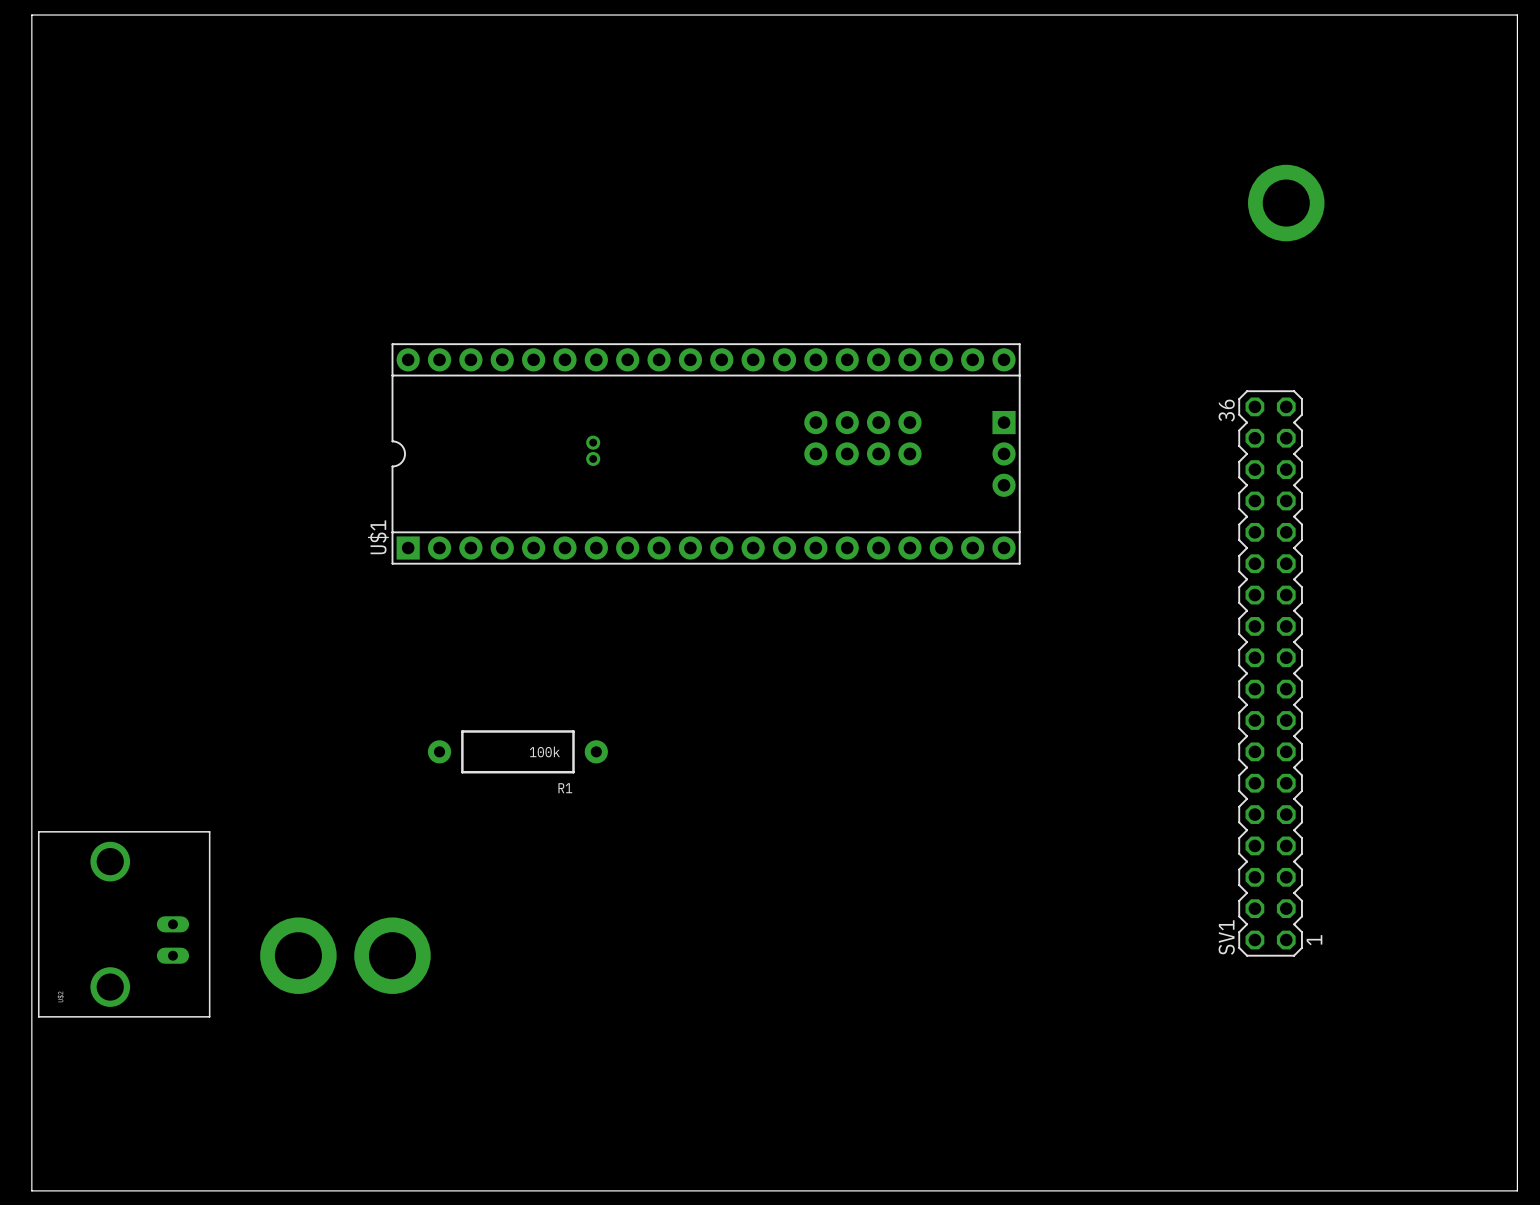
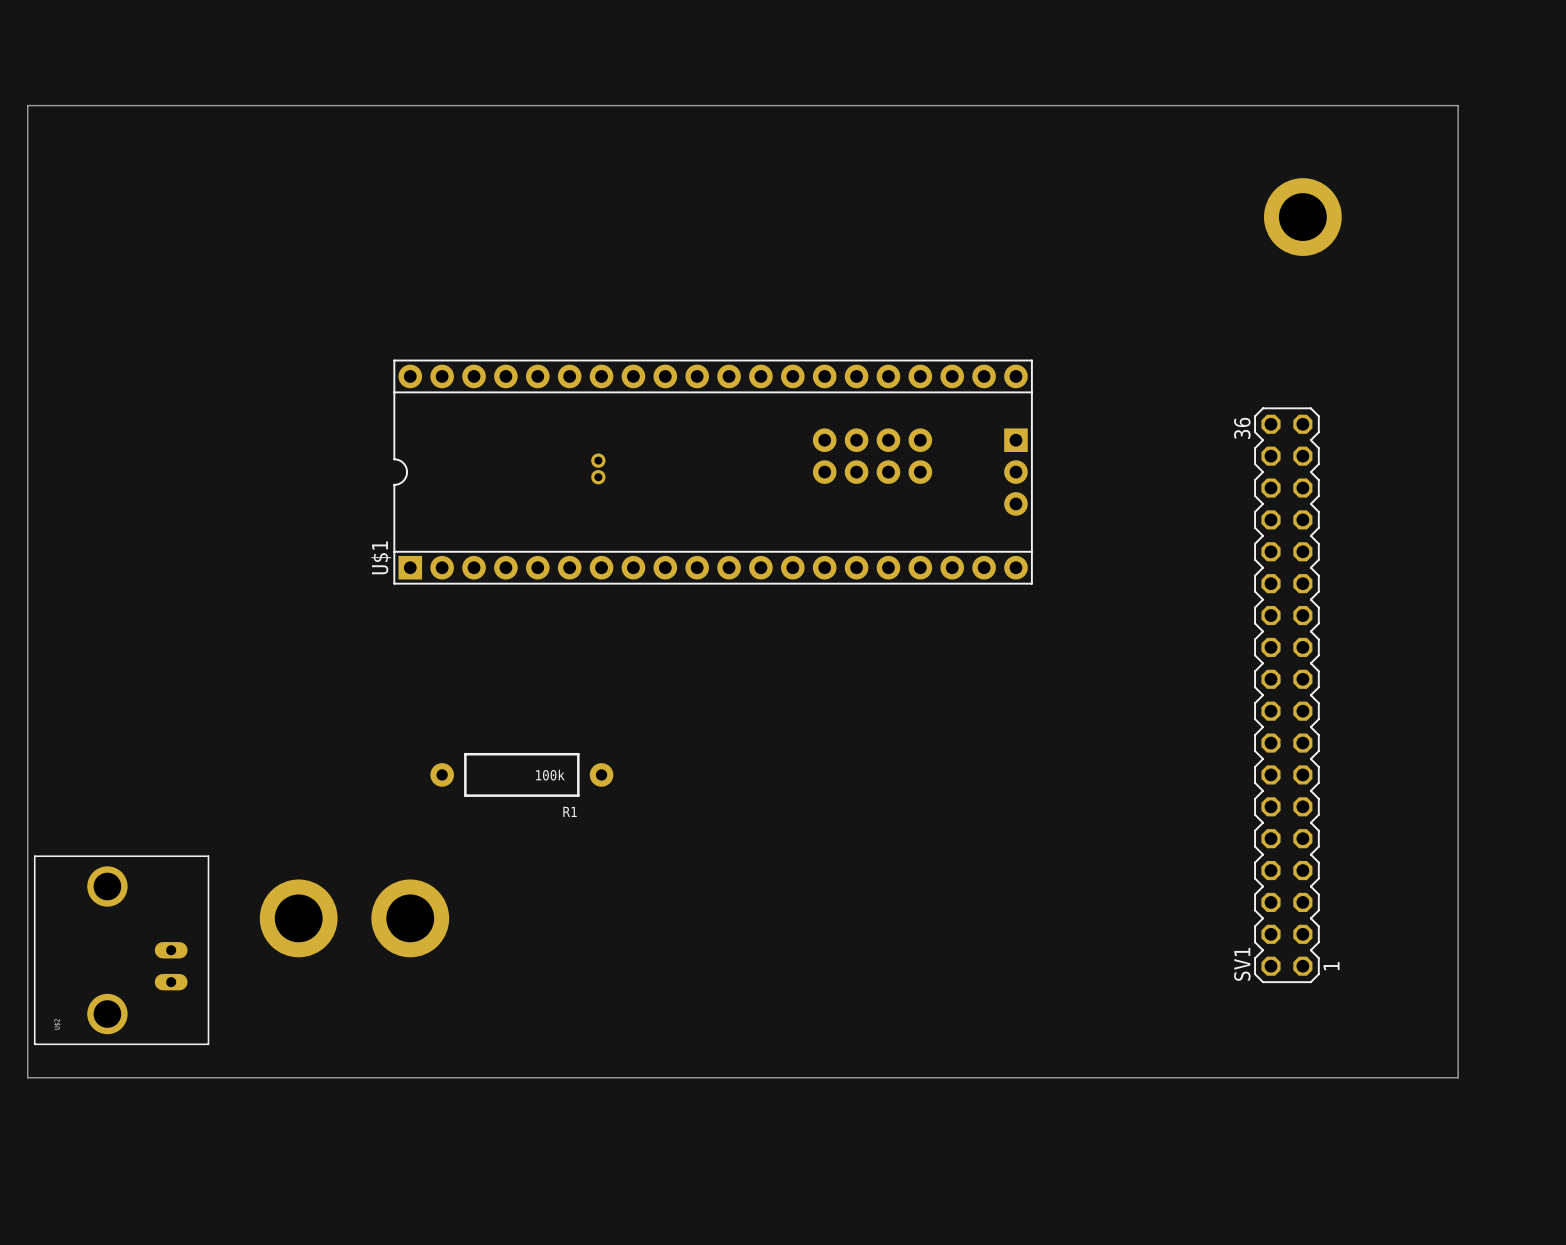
board edge: (31, 93) (31, 15) (1517, 15) (1517, 1190) (31, 1190) (31, 1049) -> (27, 105) (1458, 105) (1458, 1077) (27, 1077)
part: none -> (298, 918)
part: none -> (410, 918)
part: (298, 955) -> none
part: (392, 955) -> none

